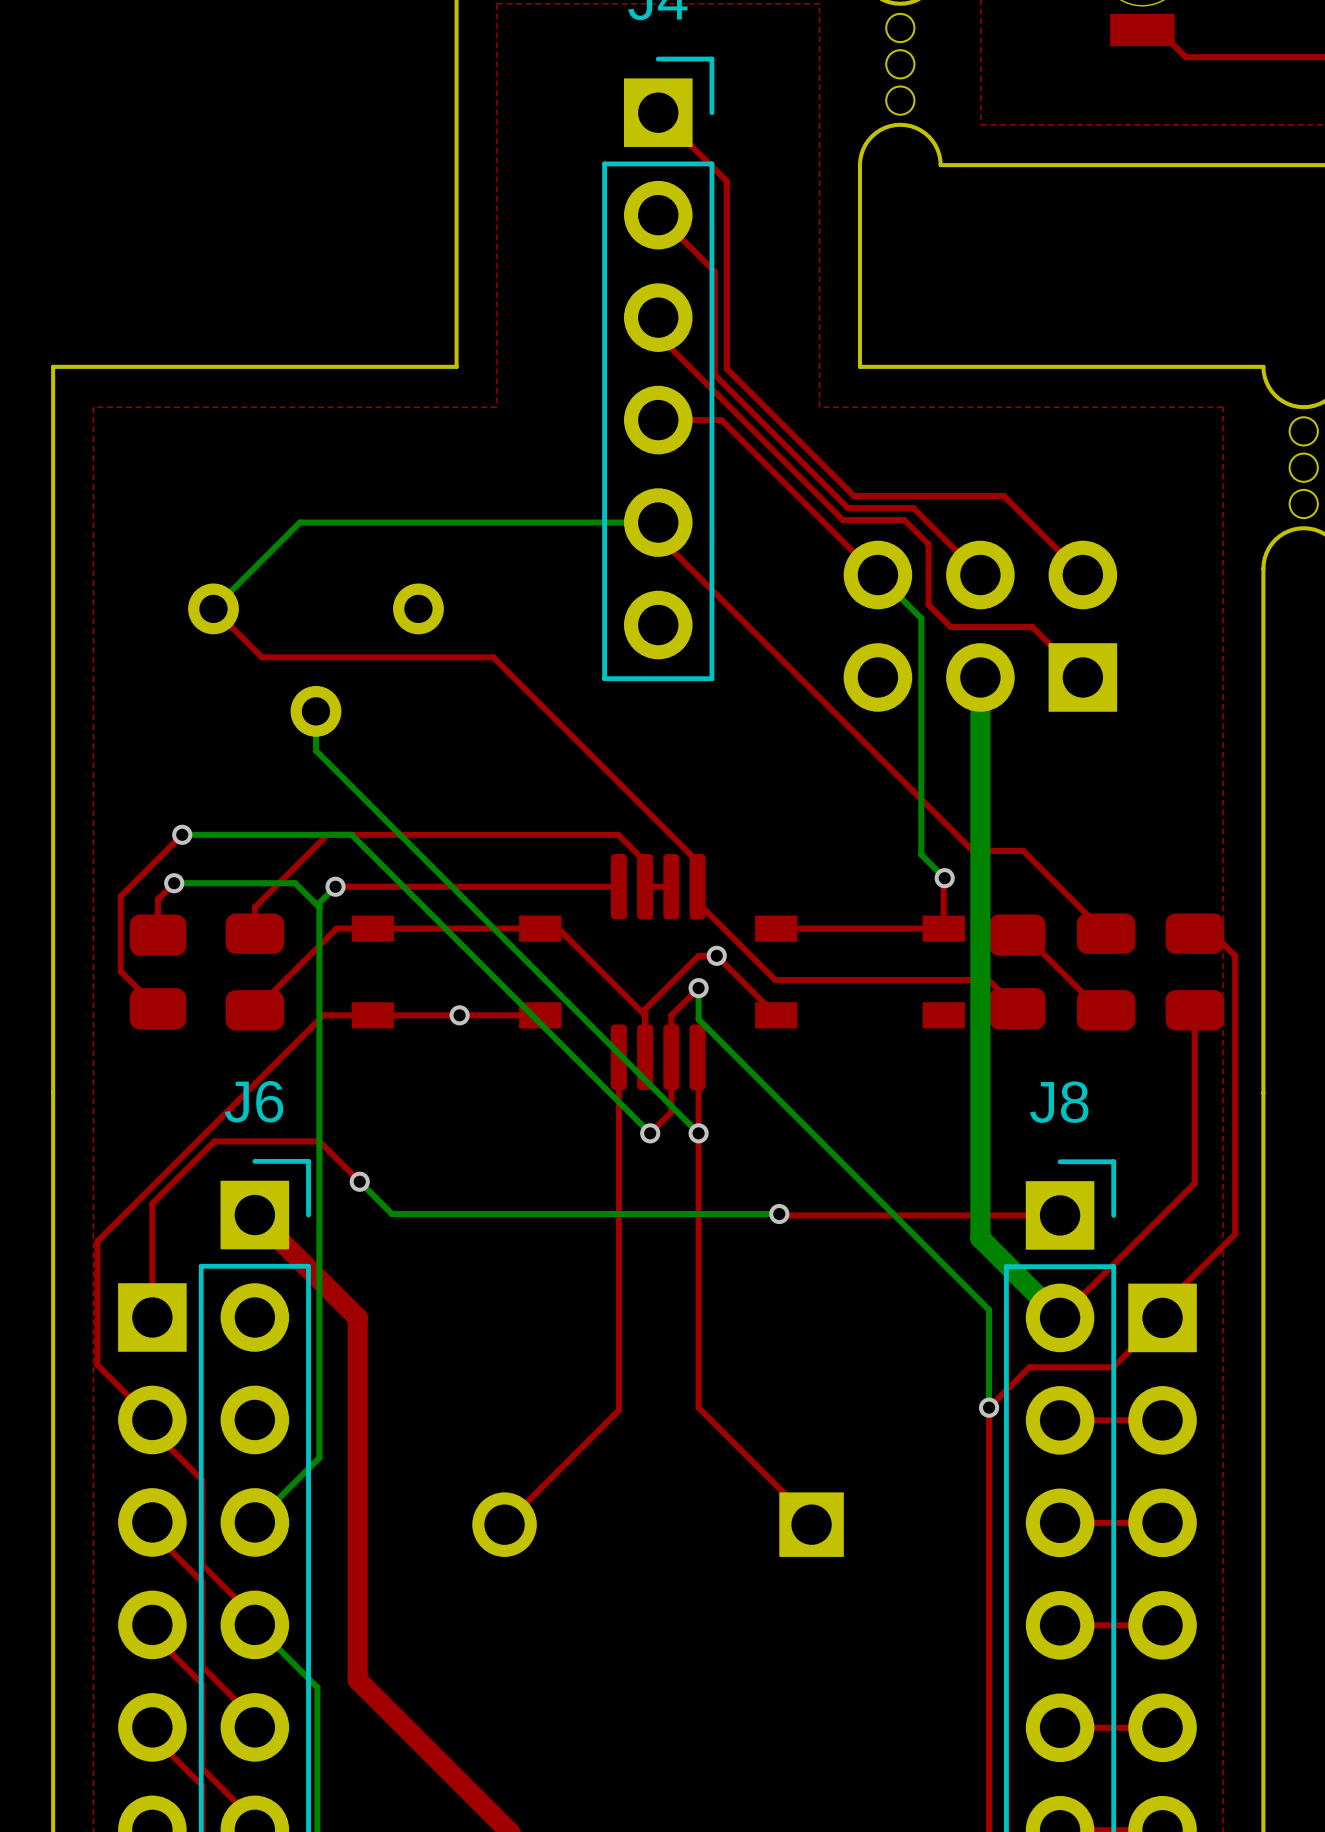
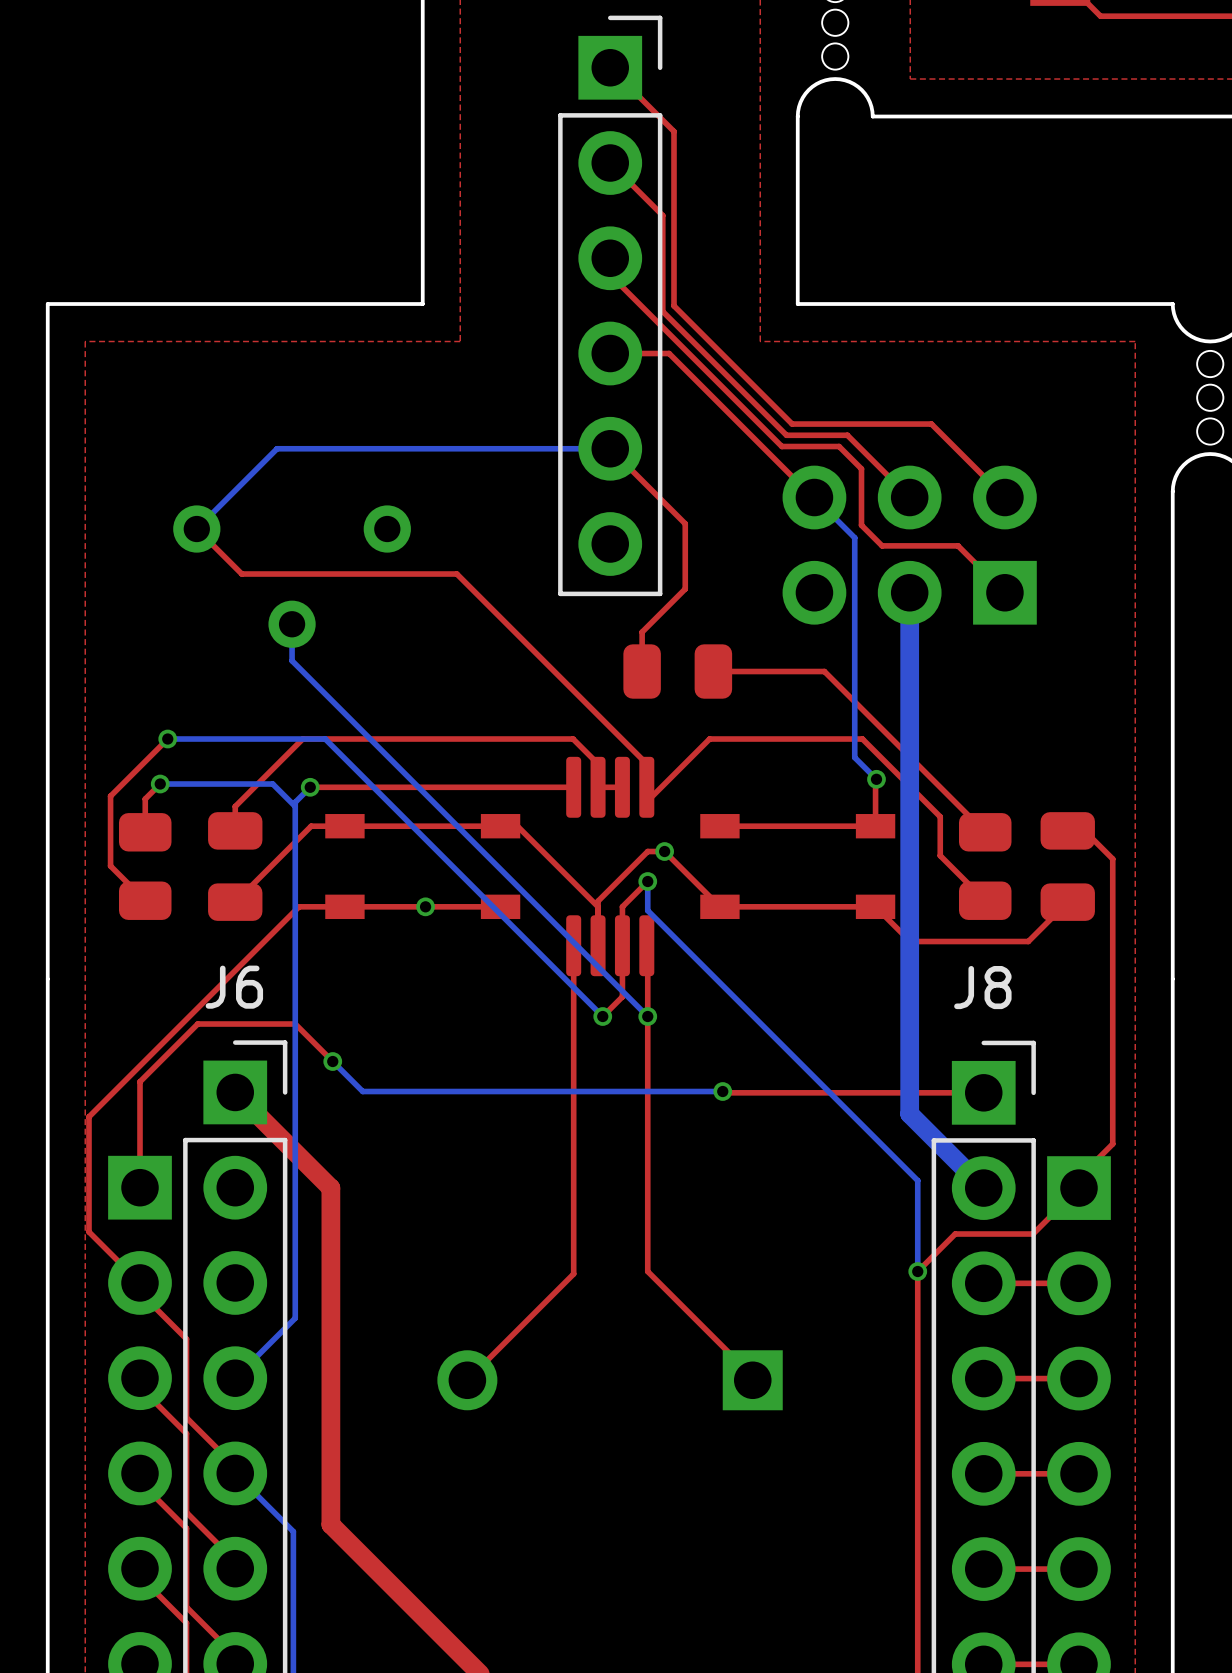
top track: (658, 522) (658, 536) (972, 850) (1023, 850) (1106, 933) -> (610, 448) (685, 523) (685, 589) (642, 632) (642, 671)
part: none -> (677, 671)
top track: none -> (713, 671) (824, 671) (985, 832)
top track: (697, 902) (775, 980) (988, 980) (1017, 1008) -> (646, 801) (709, 739) (862, 739) (940, 816) (940, 855) (985, 900)
top track: (1194, 933) (1212, 933) (1235, 955) (1235, 1234) (1198, 1270) -> (1067, 830) (1084, 830) (1112, 859) (1112, 1144)
top track: (1017, 935) (1024, 935) (1100, 1010) (1106, 1010) -> none
part position: (1017, 971) -> (985, 866)
part: (1106, 971) -> none
part: none -> (1067, 866)
part: (1194, 971) -> none
top track: none -> (1067, 902) (1028, 941) (910, 941) (875, 906) (719, 906)
top track: (1194, 1010) (1194, 1183) (1060, 1317) -> none

